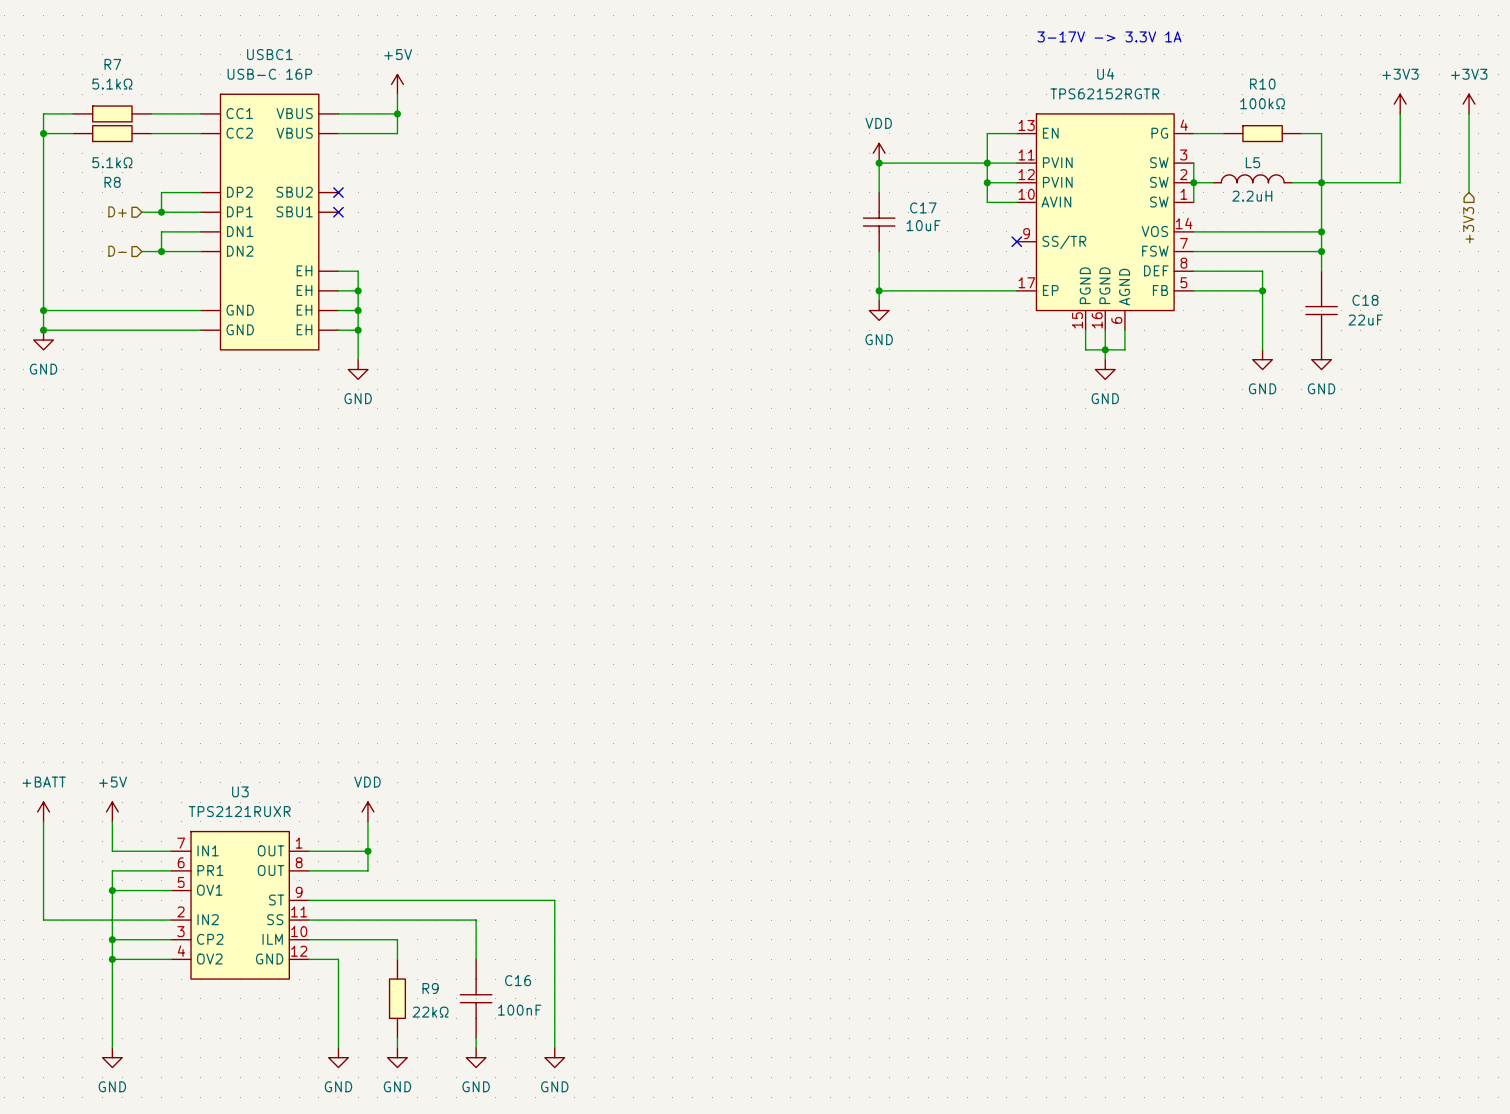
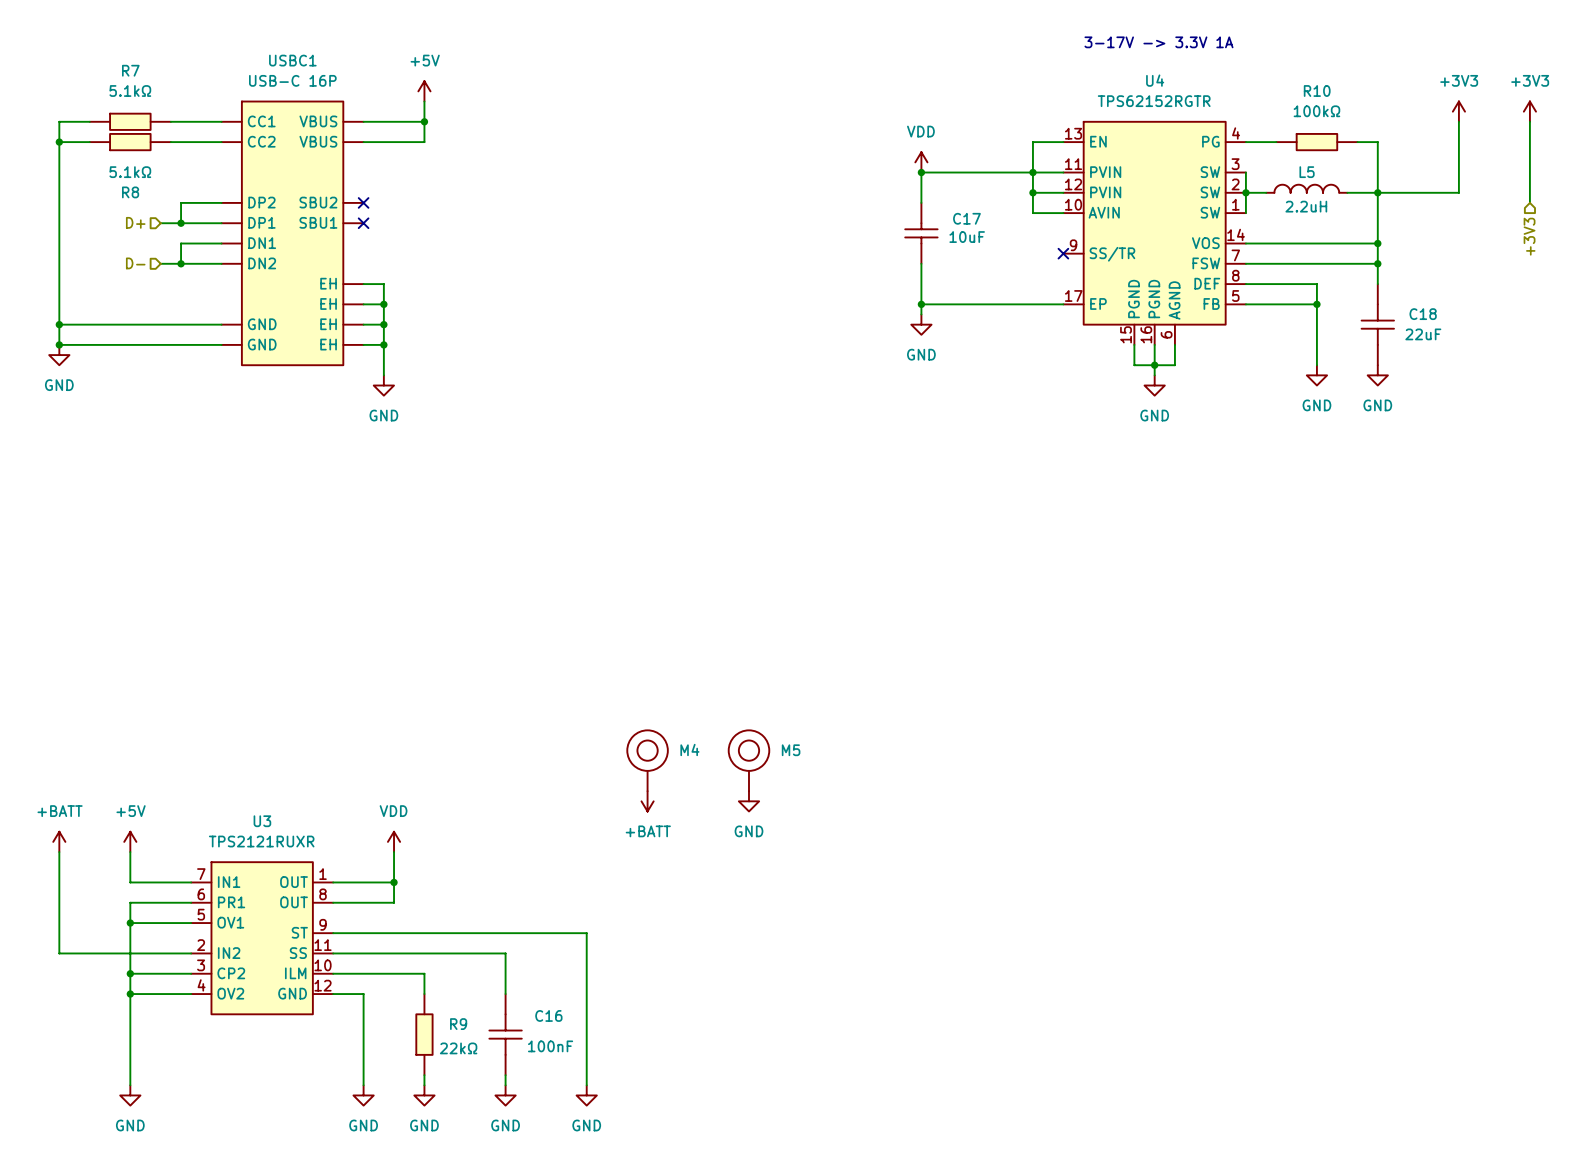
M4: none -> (647, 760)
M5: none -> (748, 760)
power symbol: none -> +BATT (647, 801)
power symbol: none -> GND (748, 801)

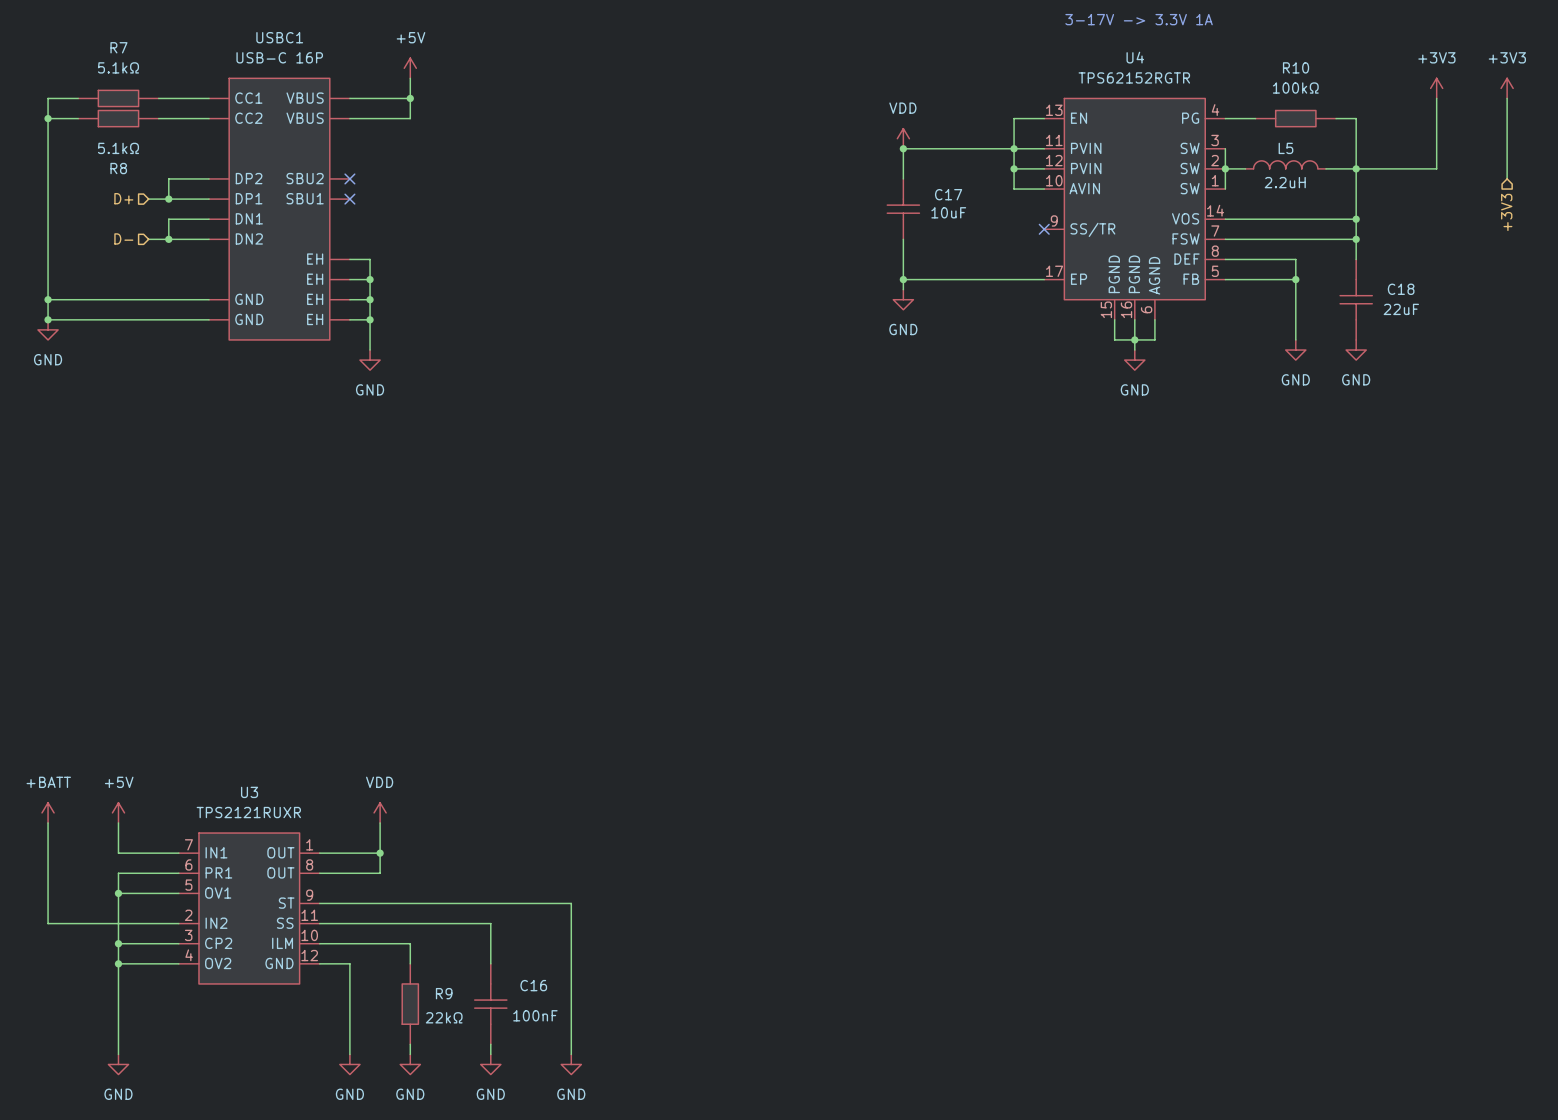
M4: (647, 760) -> none
M5: (748, 760) -> none
power symbol: +BATT (647, 801) -> none
power symbol: GND (748, 801) -> none

